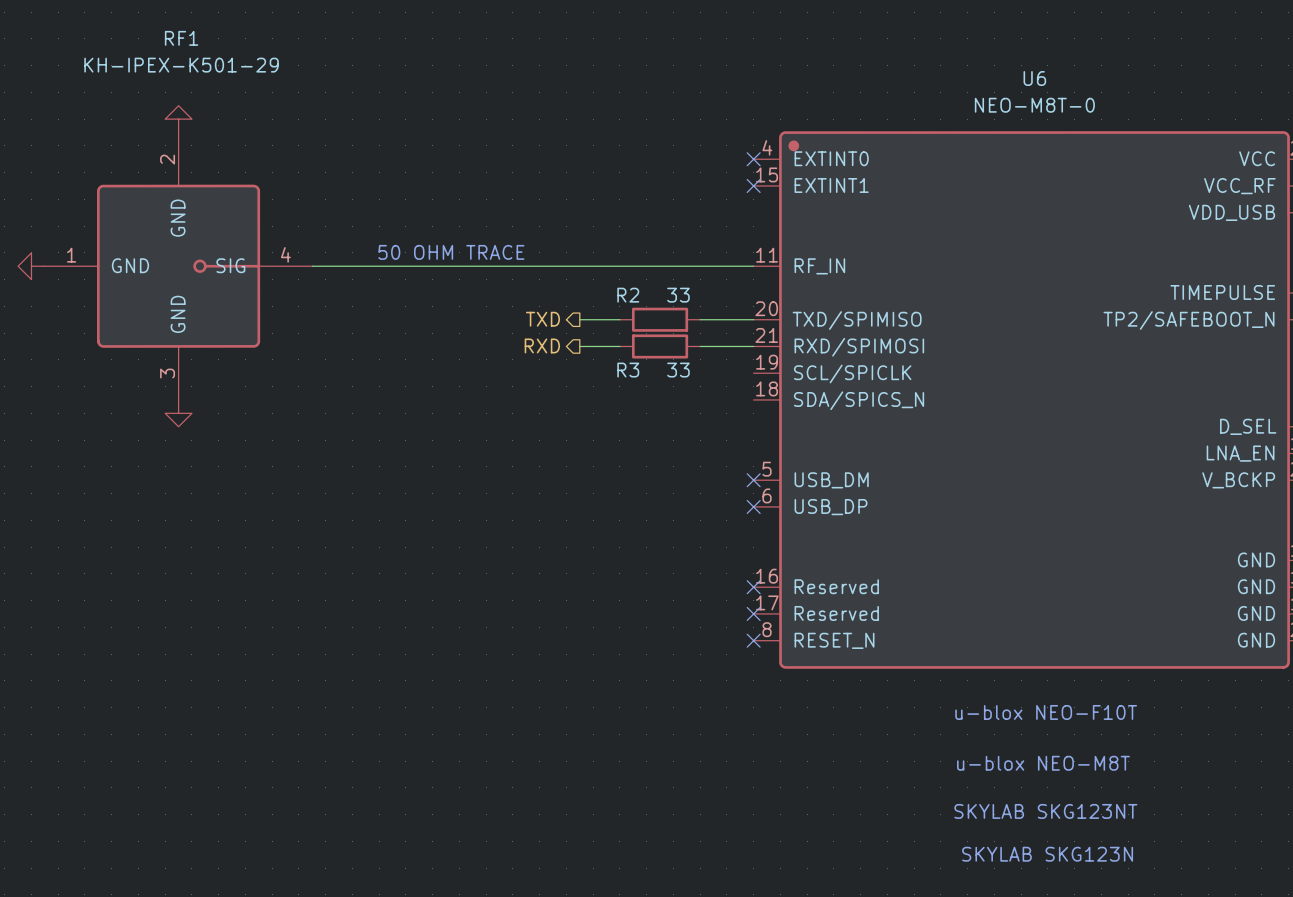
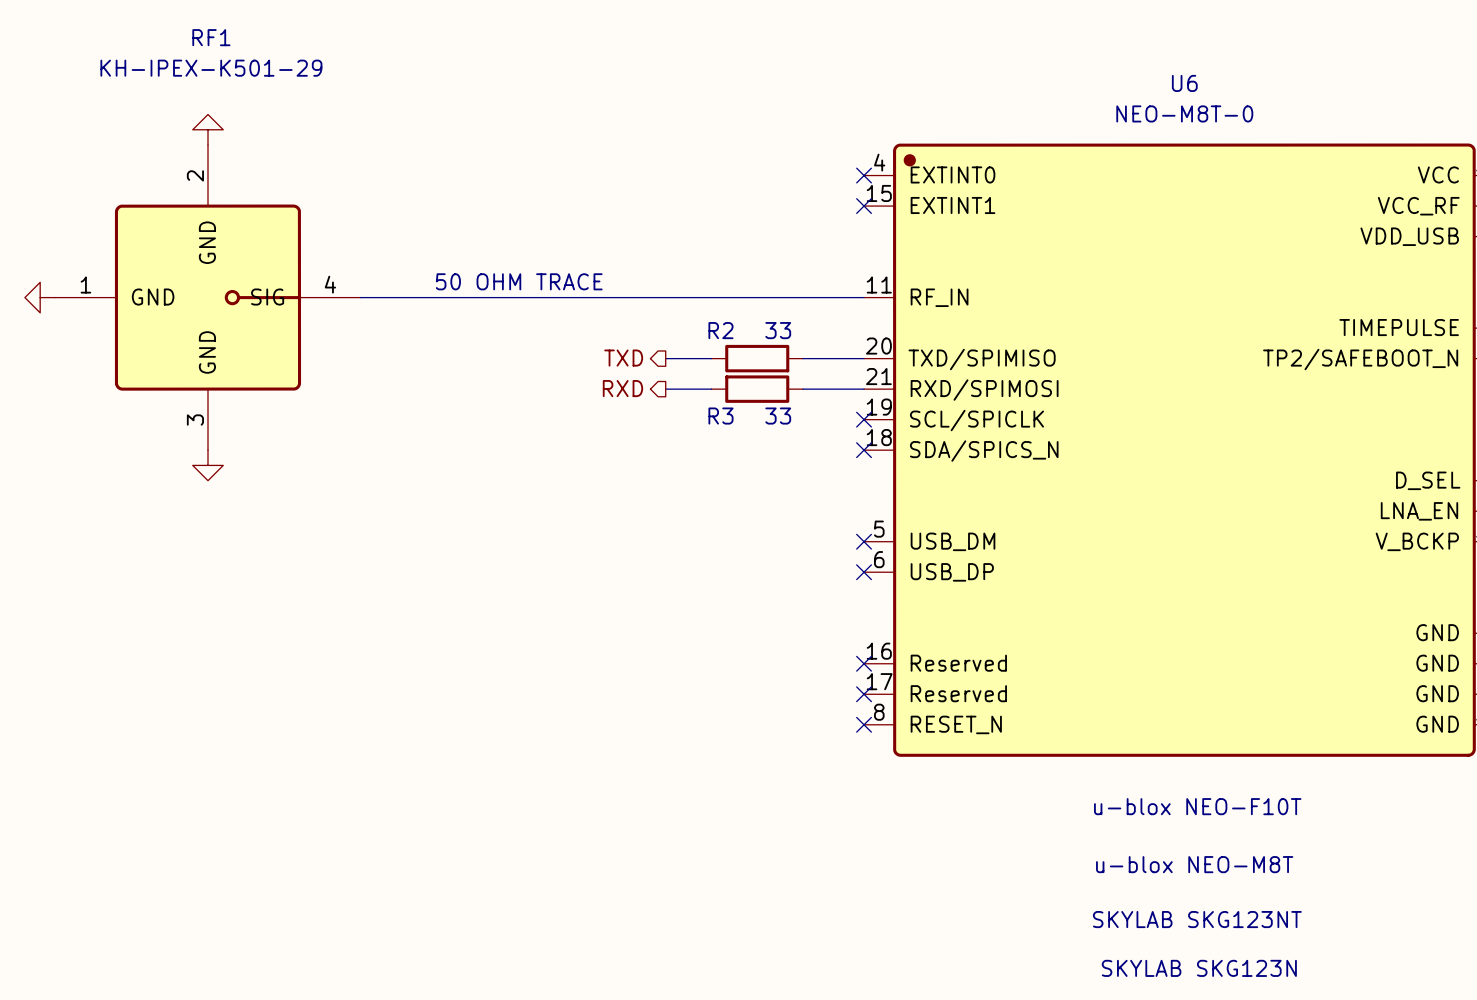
no-connect mark: none -> (864, 419)
no-connect mark: none -> (864, 450)

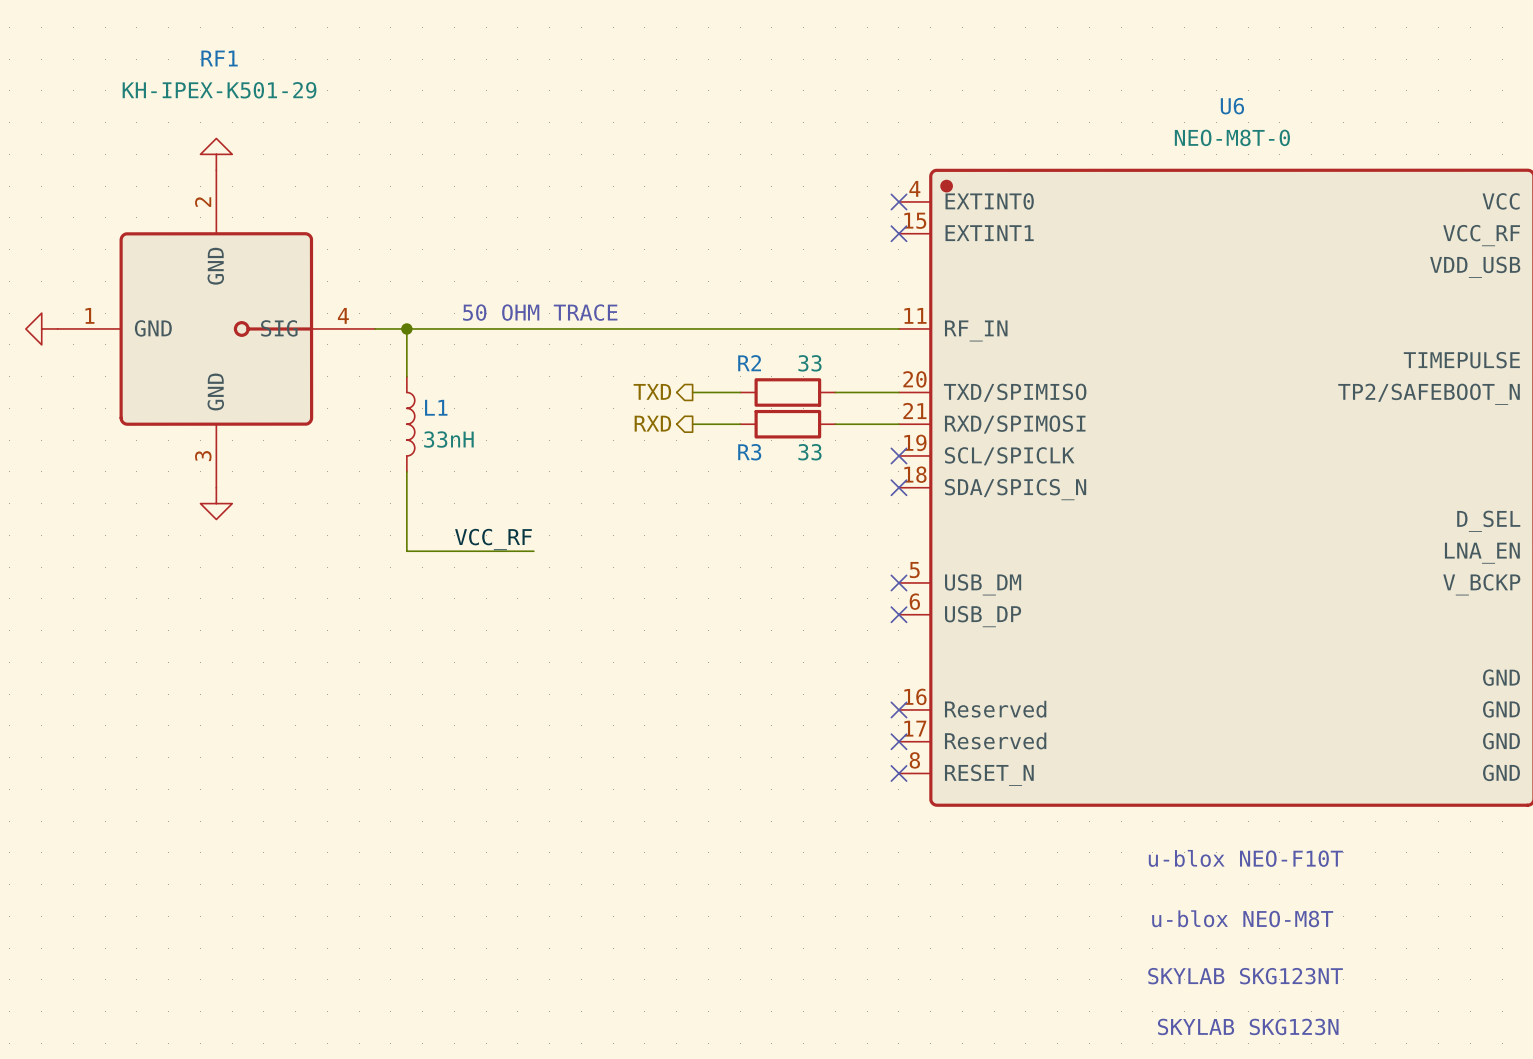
wire: none -> (406, 328) (406, 376)
junction: none -> (406, 328)
L1: none -> 33nH (410, 424)
wire: none -> (406, 471) (406, 551) (533, 551)
label: none -> VCC_RF (493, 539)

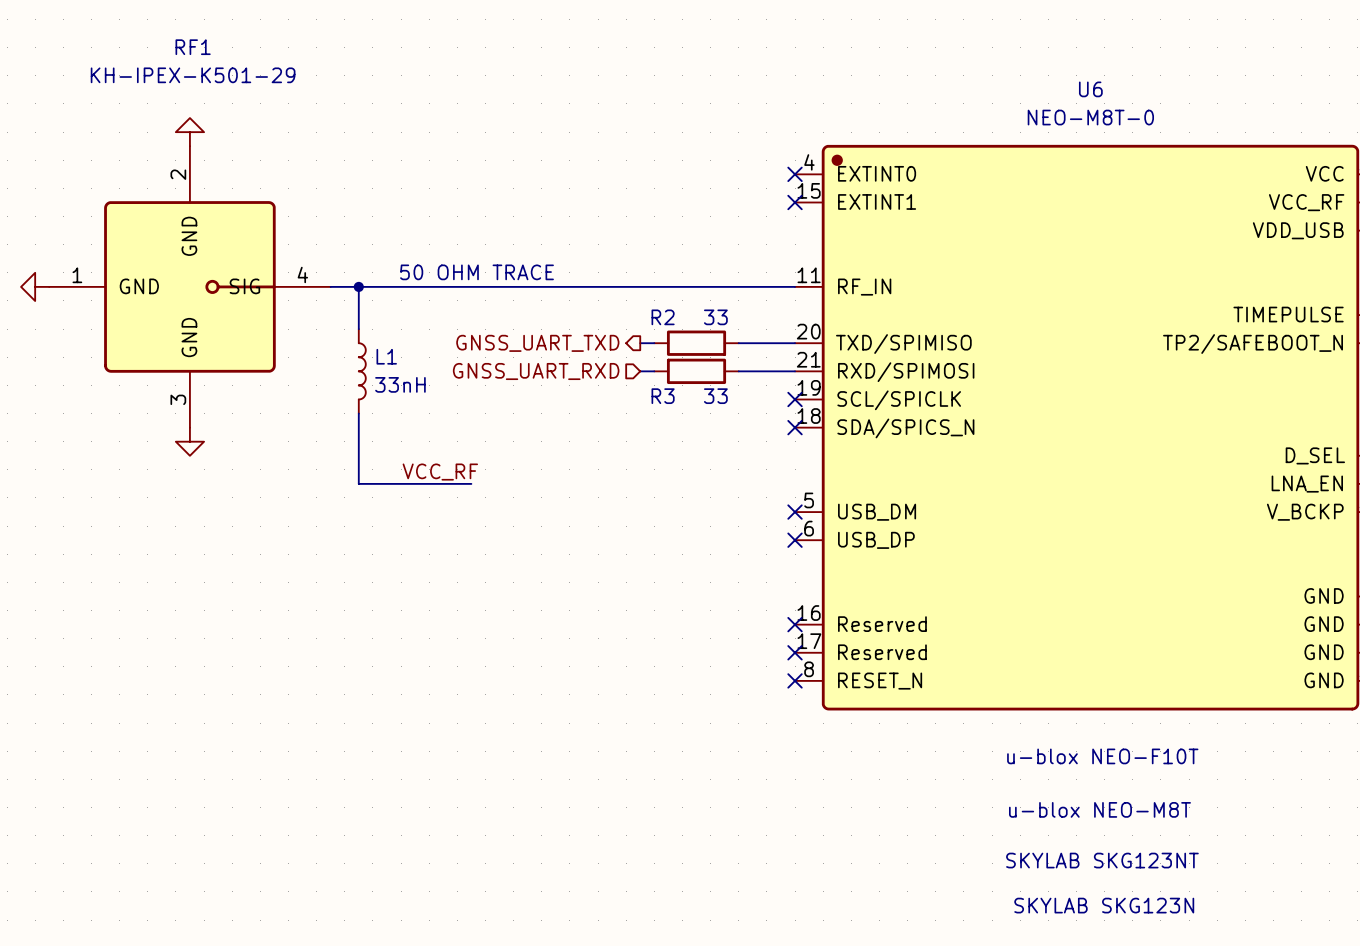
hierarchical label: TXD (652, 391) -> none
wire: (692, 392) (724, 392) -> none
hierarchical label: none -> GNSS_UART_TXD (537, 343)
hierarchical label: RXD (652, 423) -> none
wire: (692, 424) (724, 424) -> none
hierarchical label: none -> GNSS_UART_RXD (536, 371)

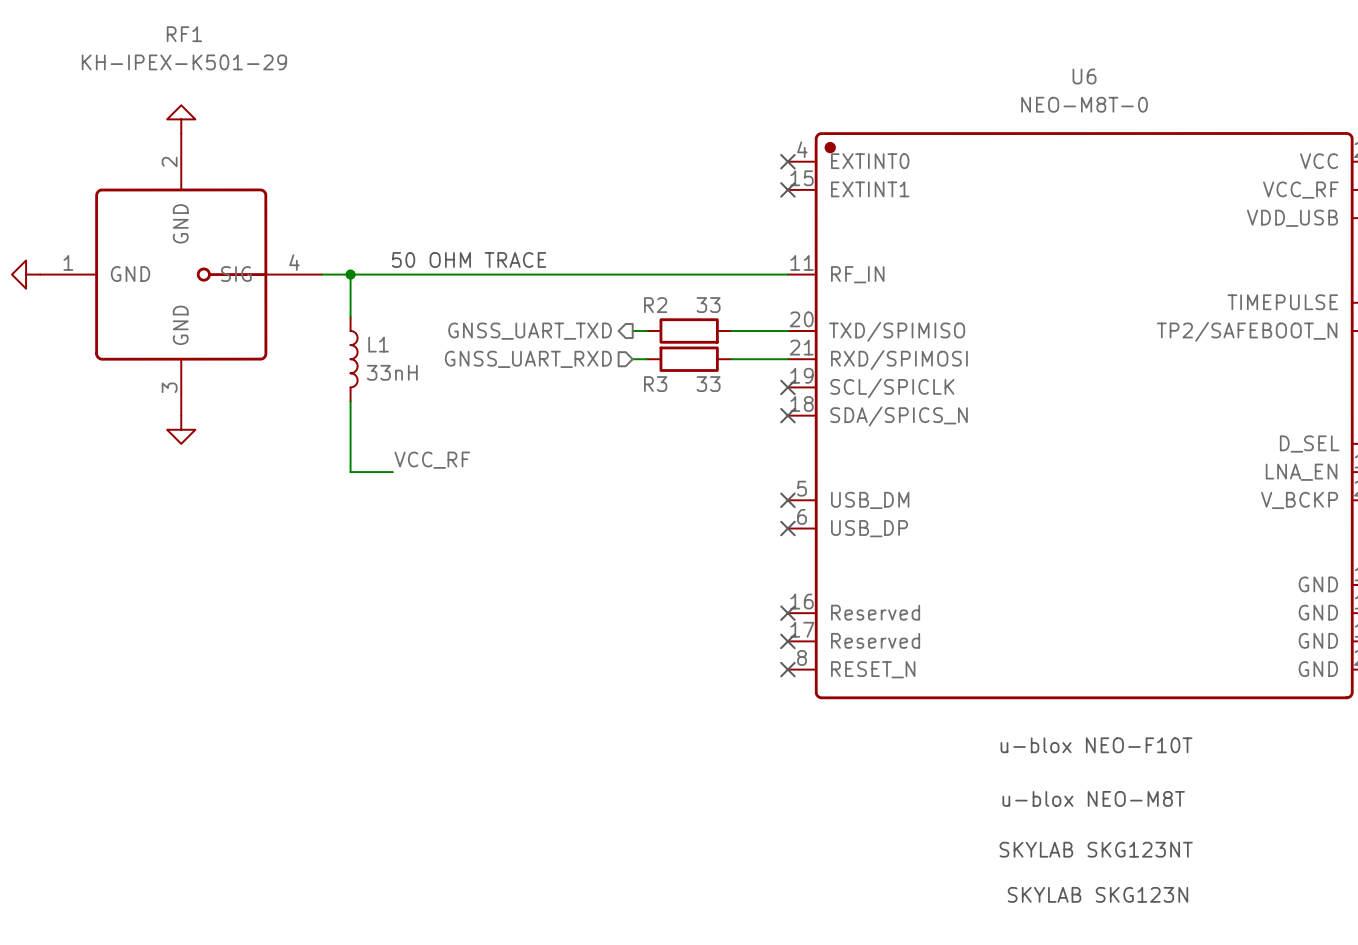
wire: (401, 483) (471, 483) -> none

